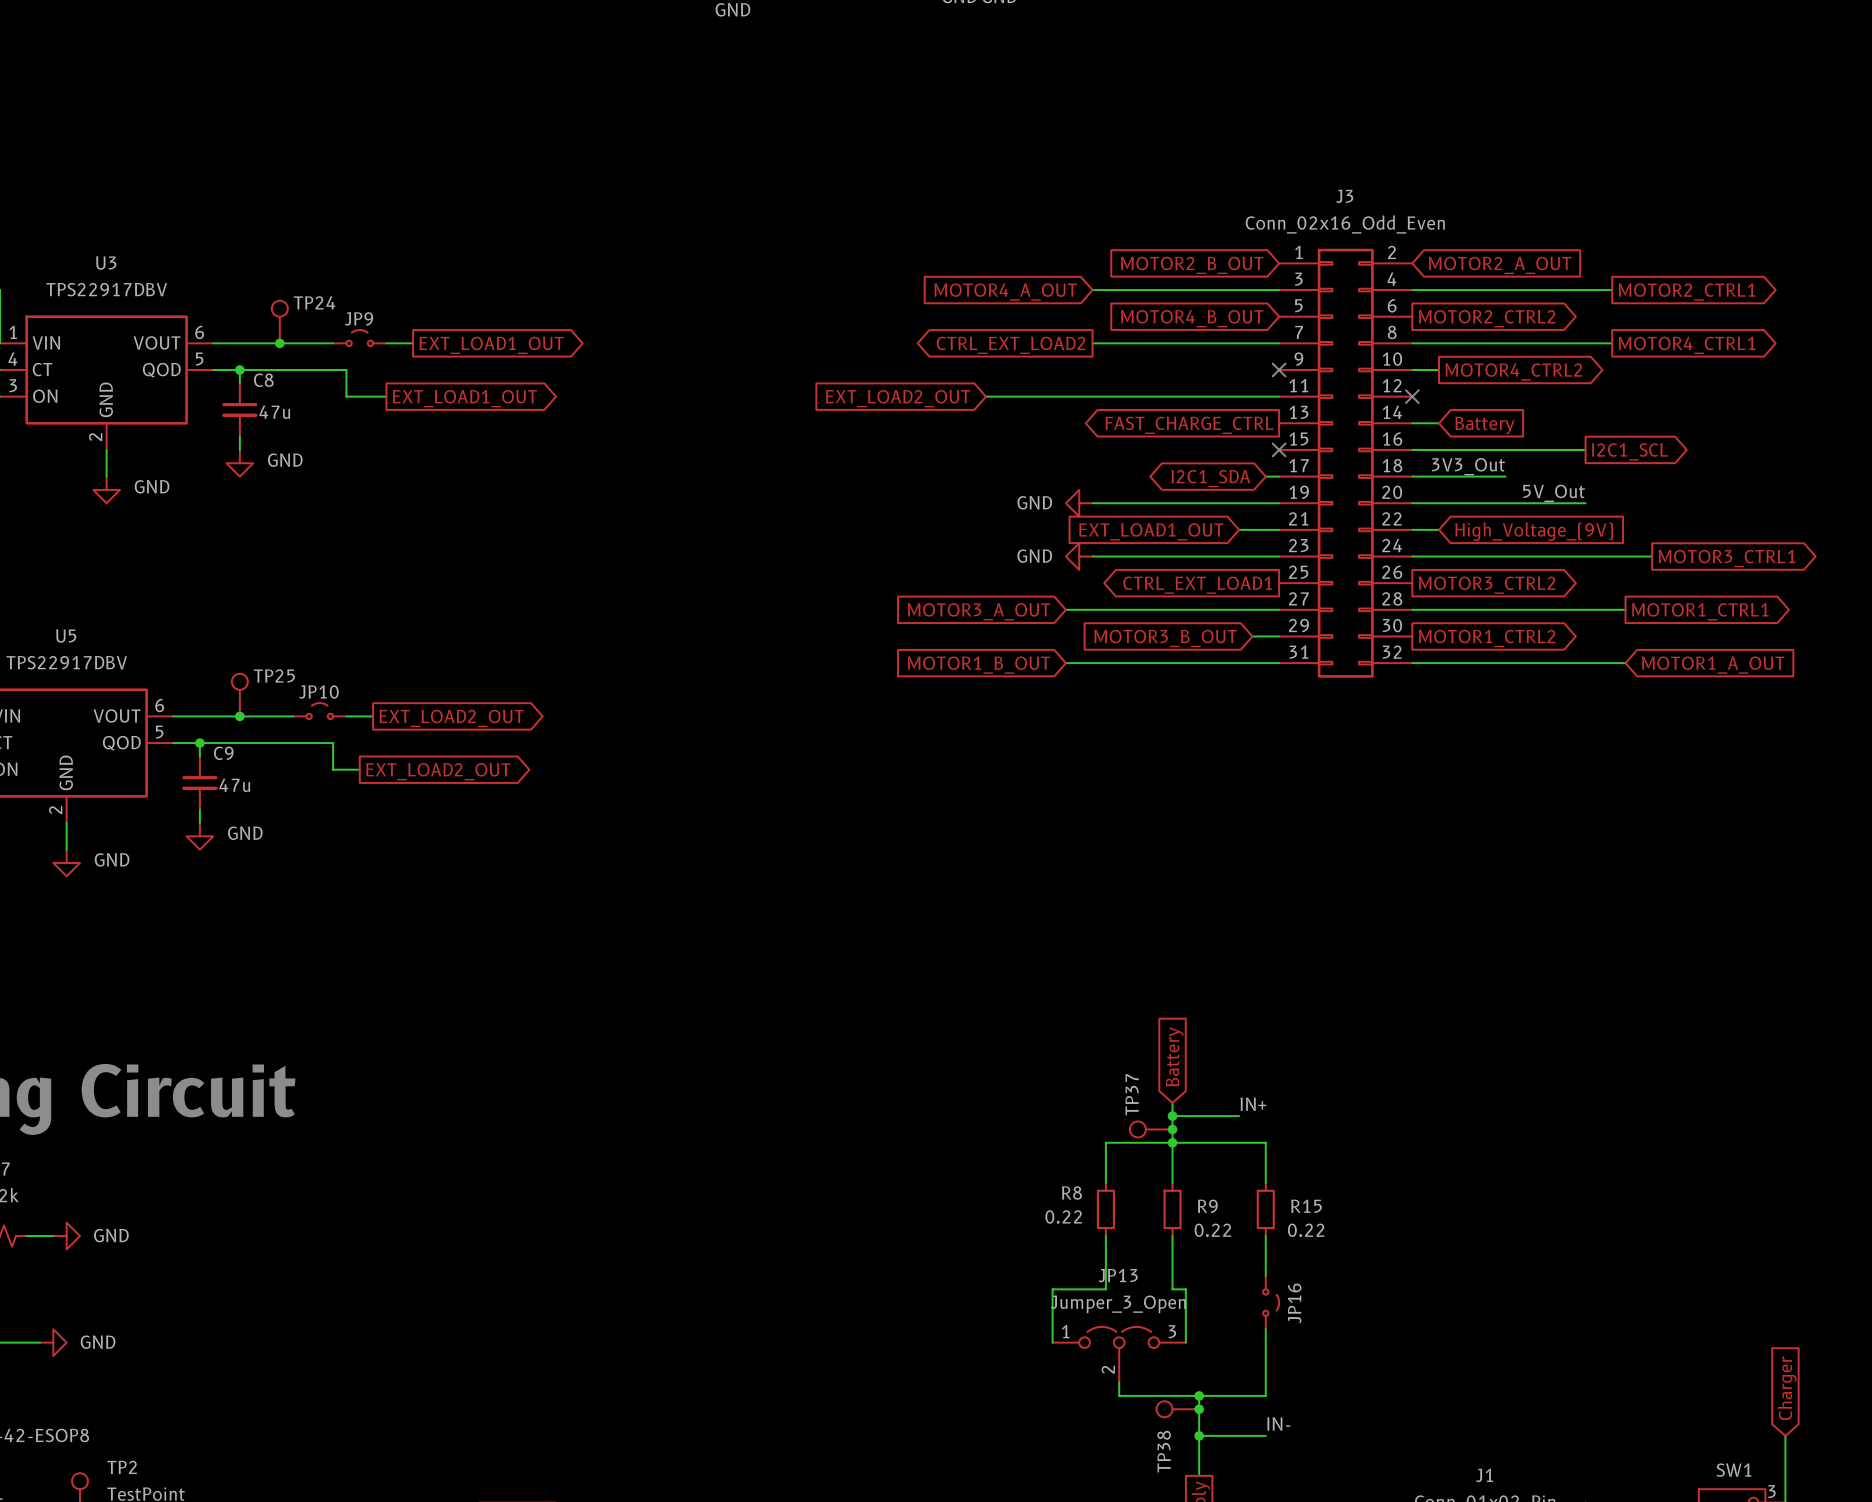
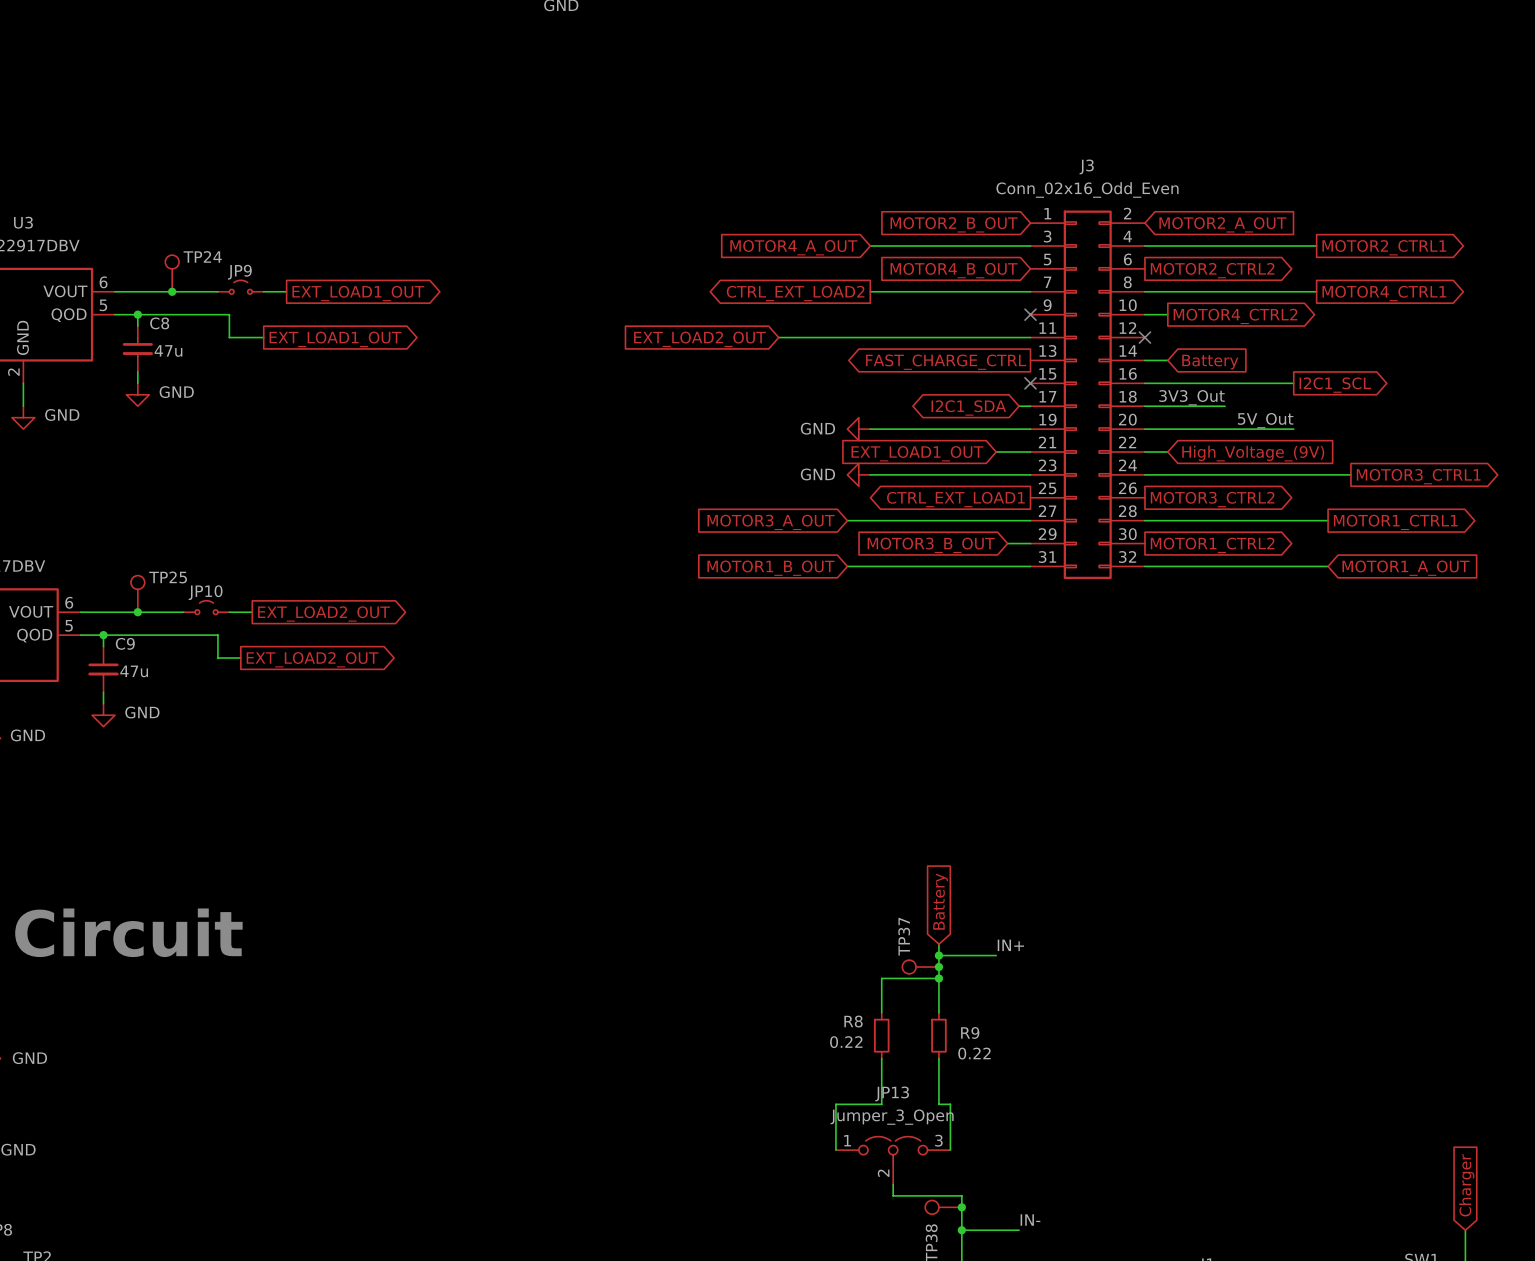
wire: (1172, 1142) (1265, 1142) (1265, 1182) -> none
R15: 0.22 (1265, 1209) -> none
wire: (1265, 1236) (1265, 1276) -> none
JP16: (1271, 1302) -> none
wire: (1265, 1329) (1265, 1395) (1199, 1395) -> none
junction: (1199, 1395) -> none

